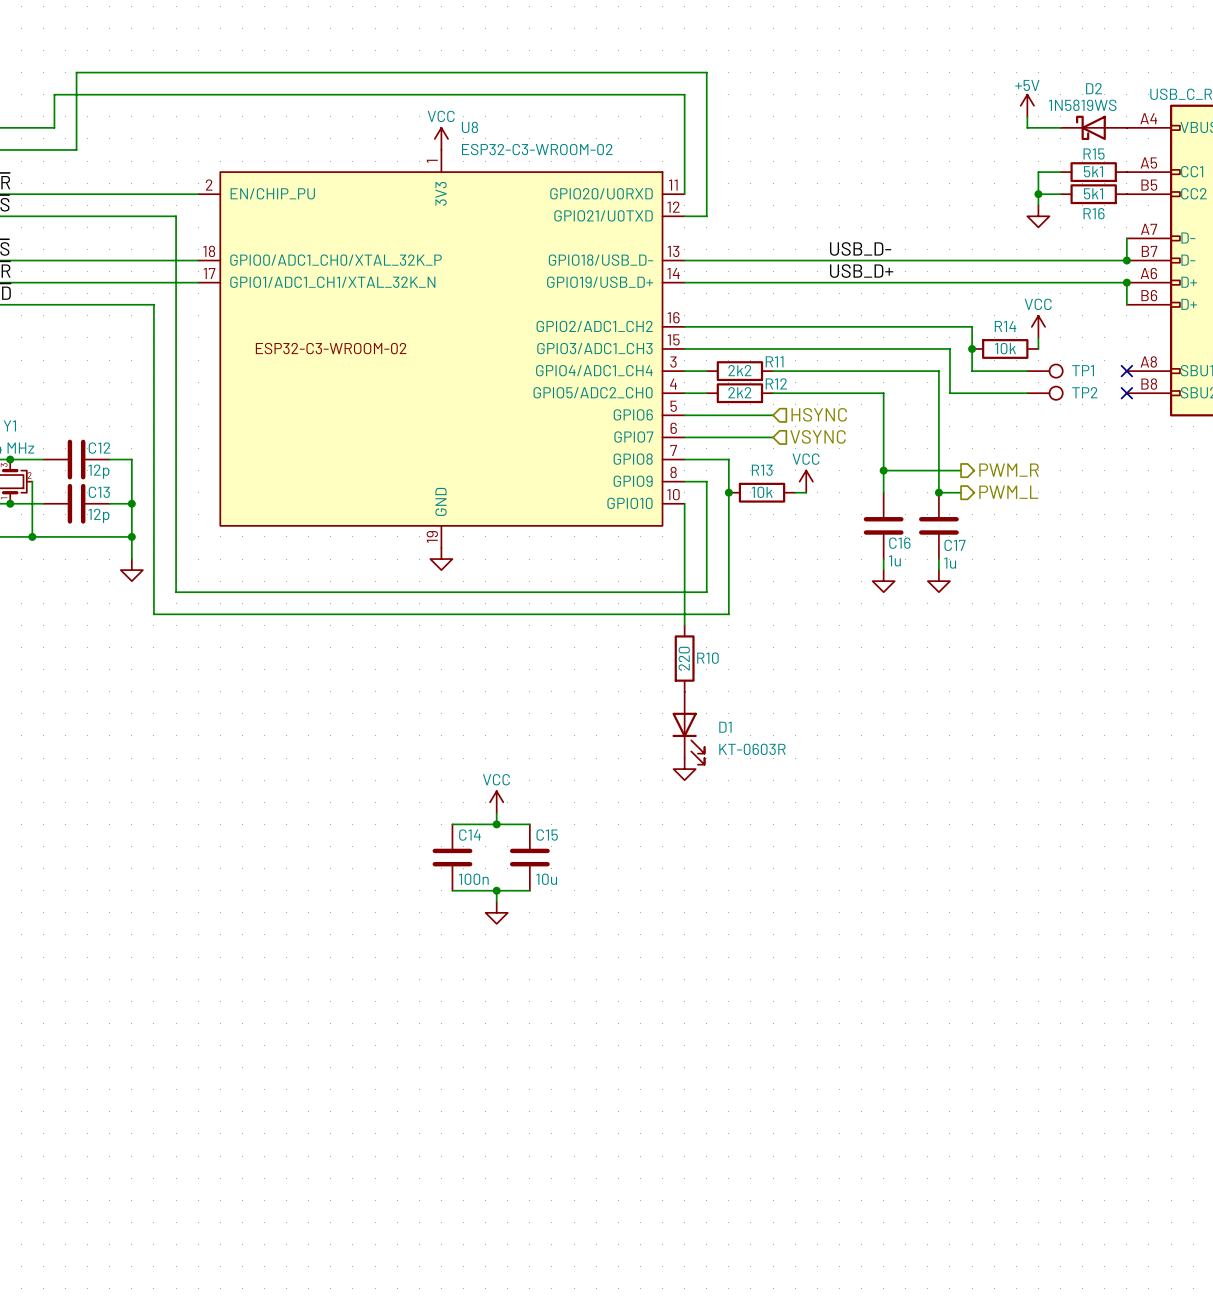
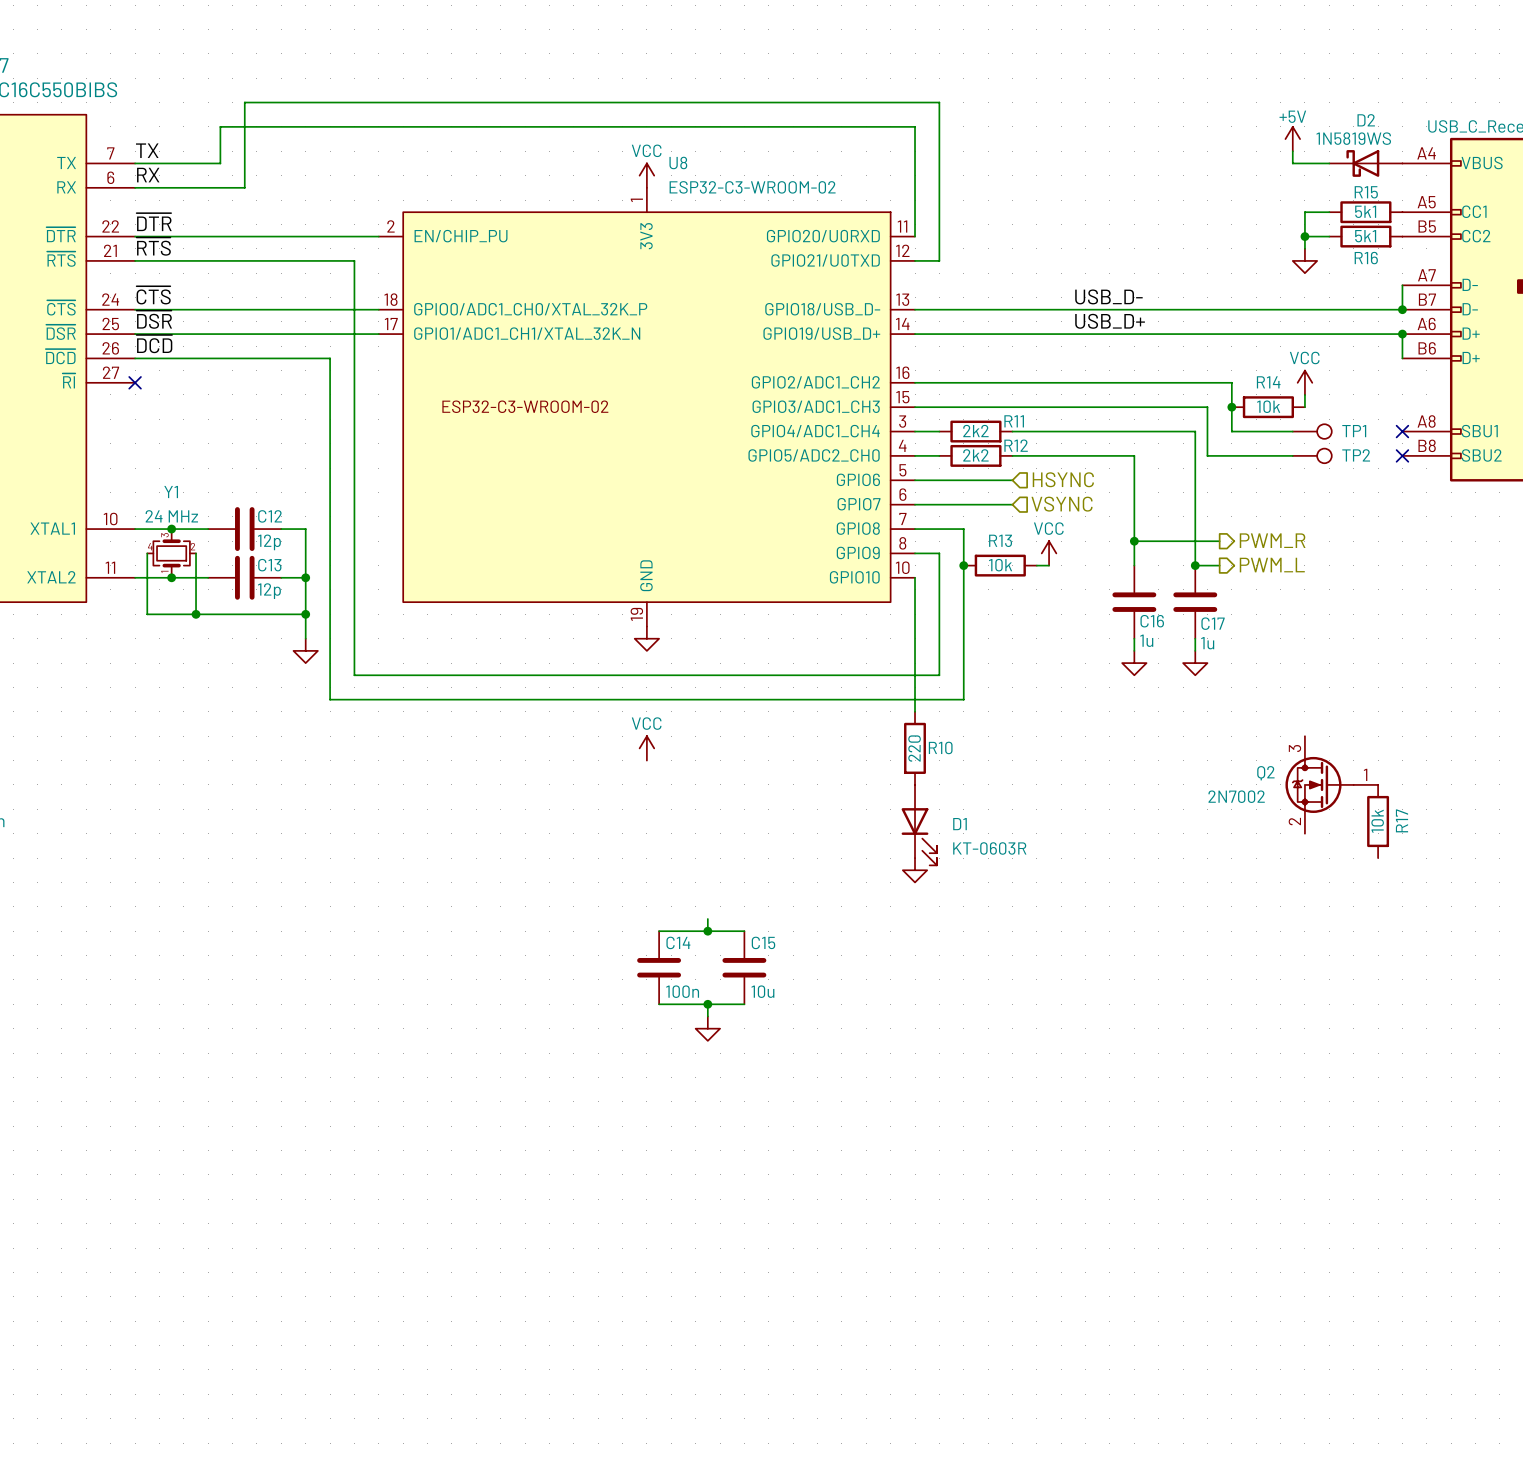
Q2: none -> 2N7002 (1331, 784)
R17: none -> 10k (1378, 821)
power symbol position: VCC (496, 802) -> VCC (646, 748)

